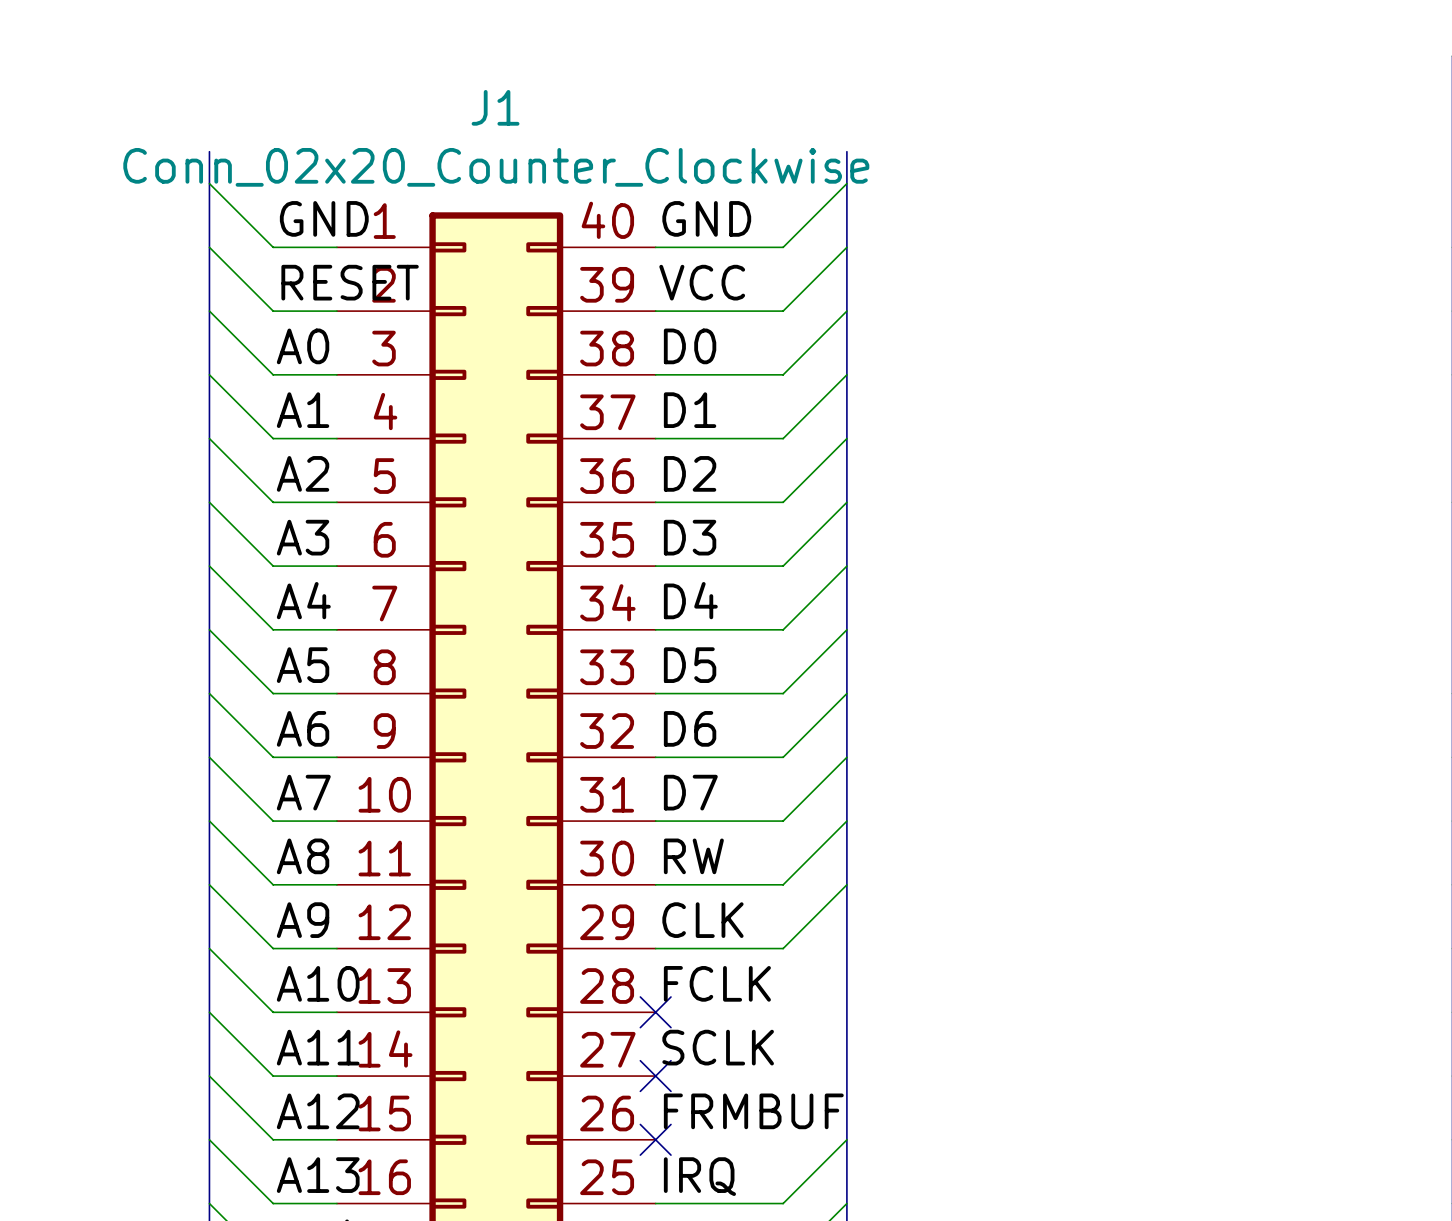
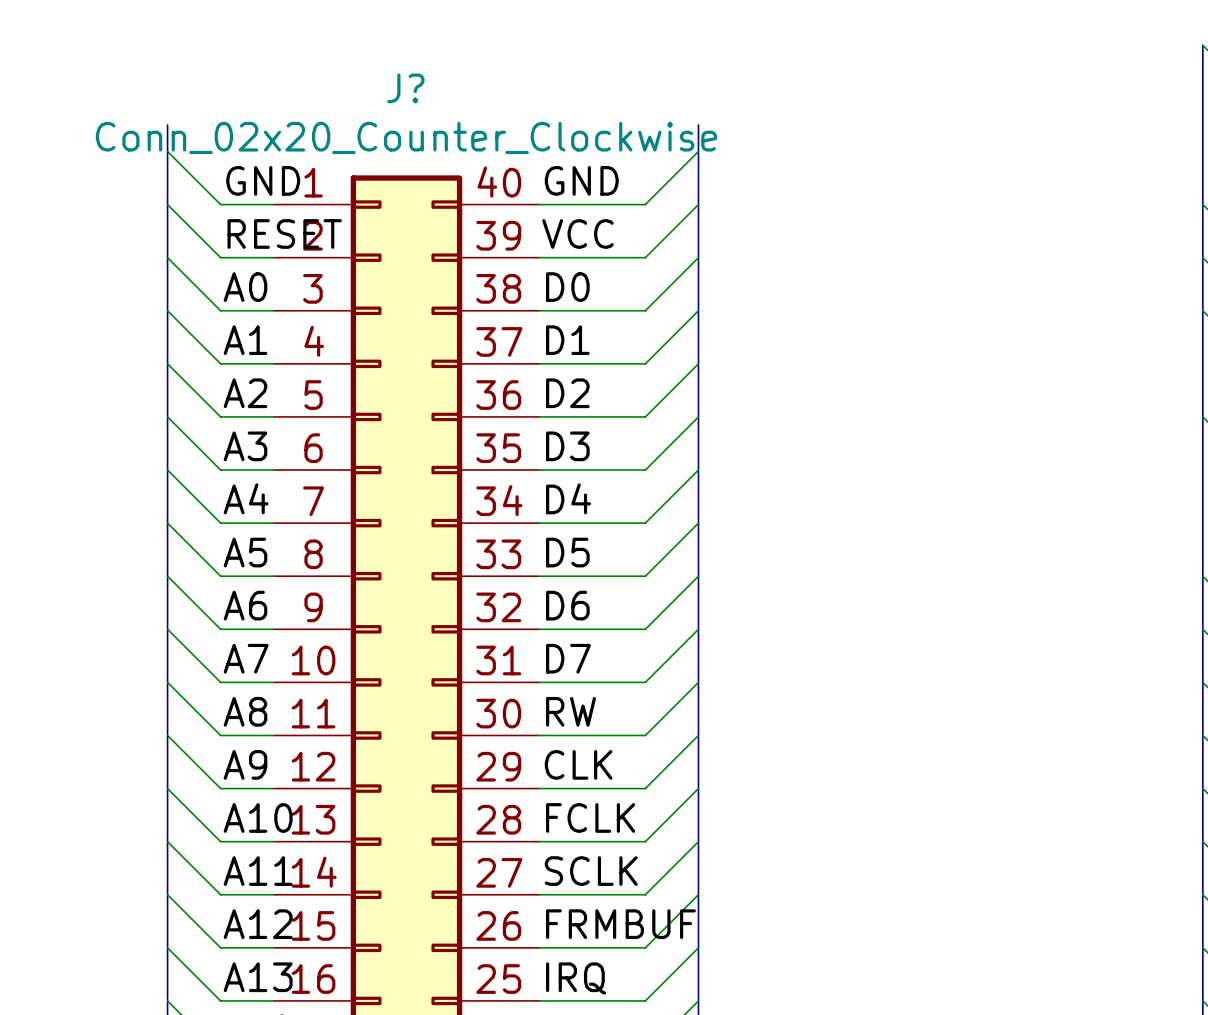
J1 name: J1 (495, 107) -> J? (405, 88)
wire: none -> (698, 788) (645, 841) (539, 841)
no-connect mark: (655, 1012) -> none
wire: none -> (698, 841) (645, 894) (539, 894)
no-connect mark: (655, 1076) -> none
wire: none -> (698, 894) (645, 947) (539, 947)
no-connect mark: (655, 1139) -> none

